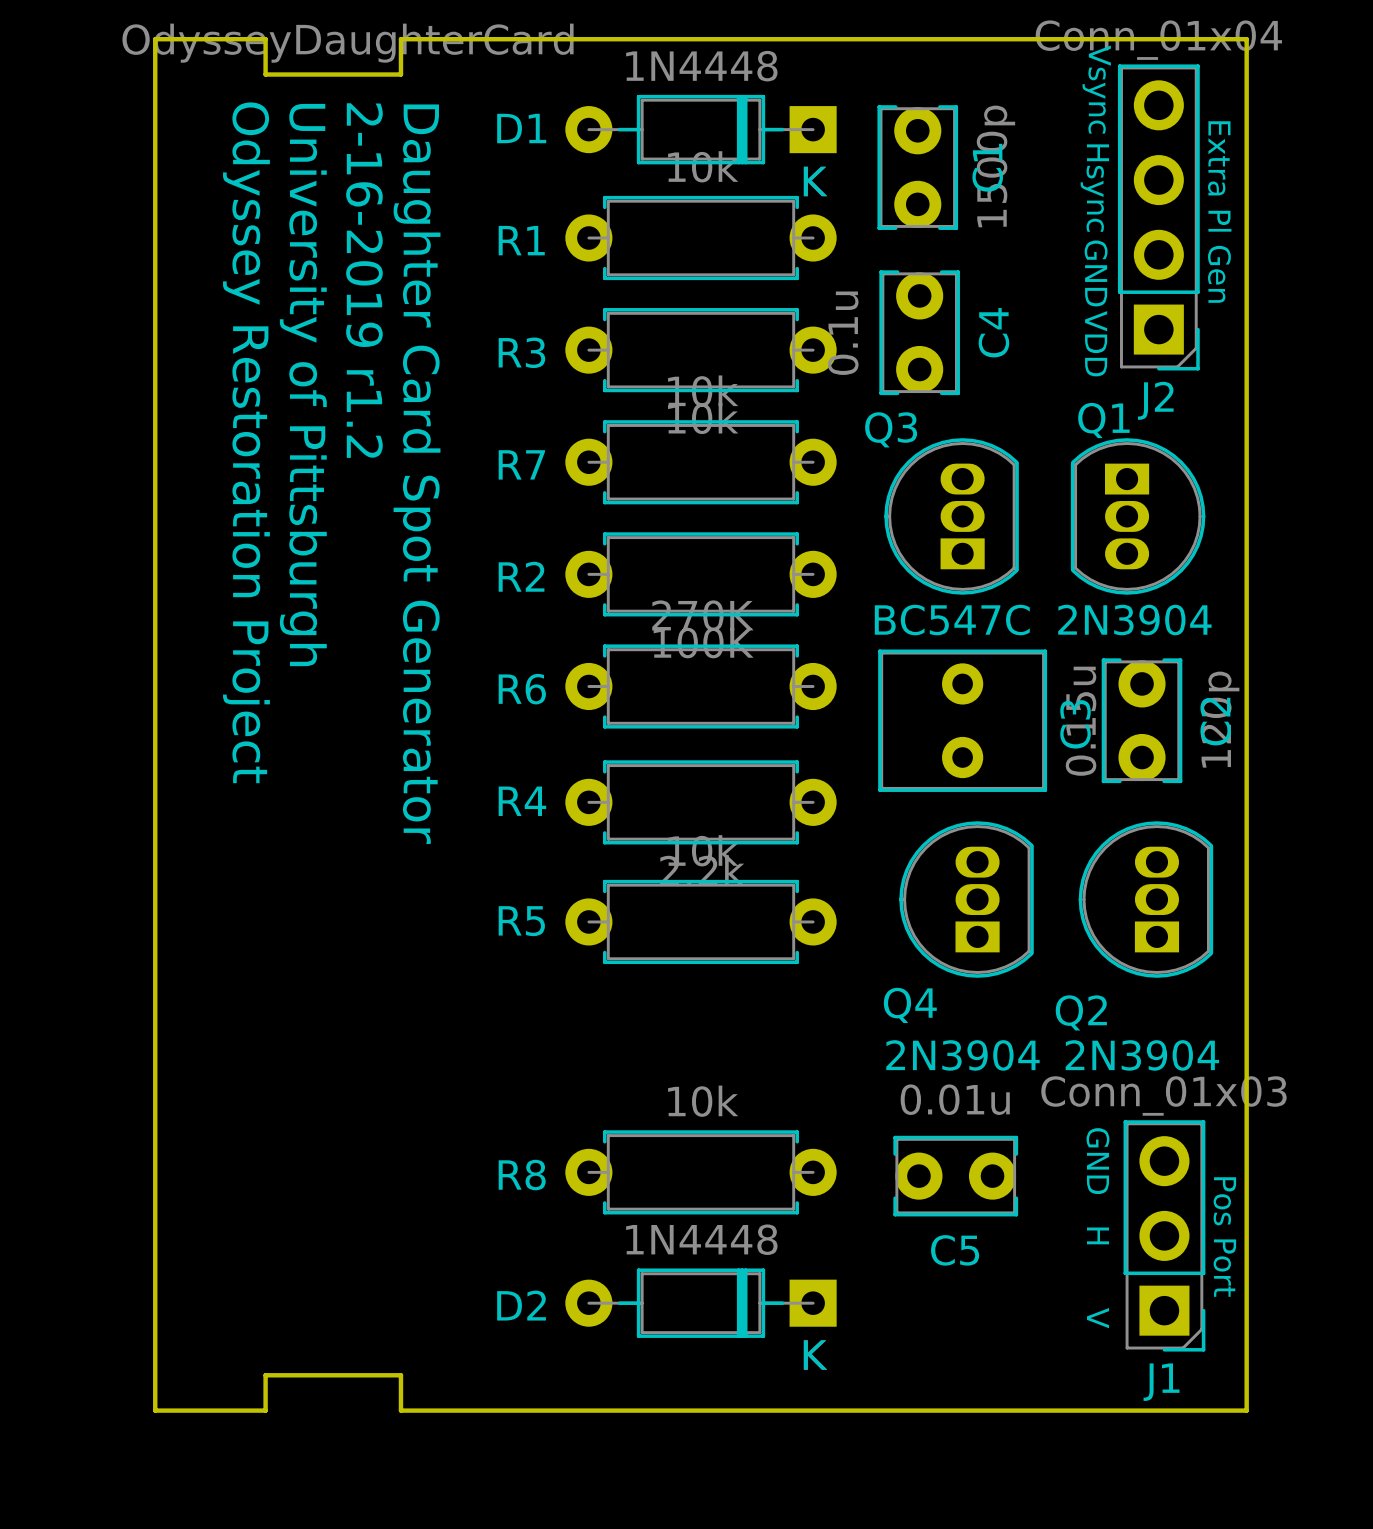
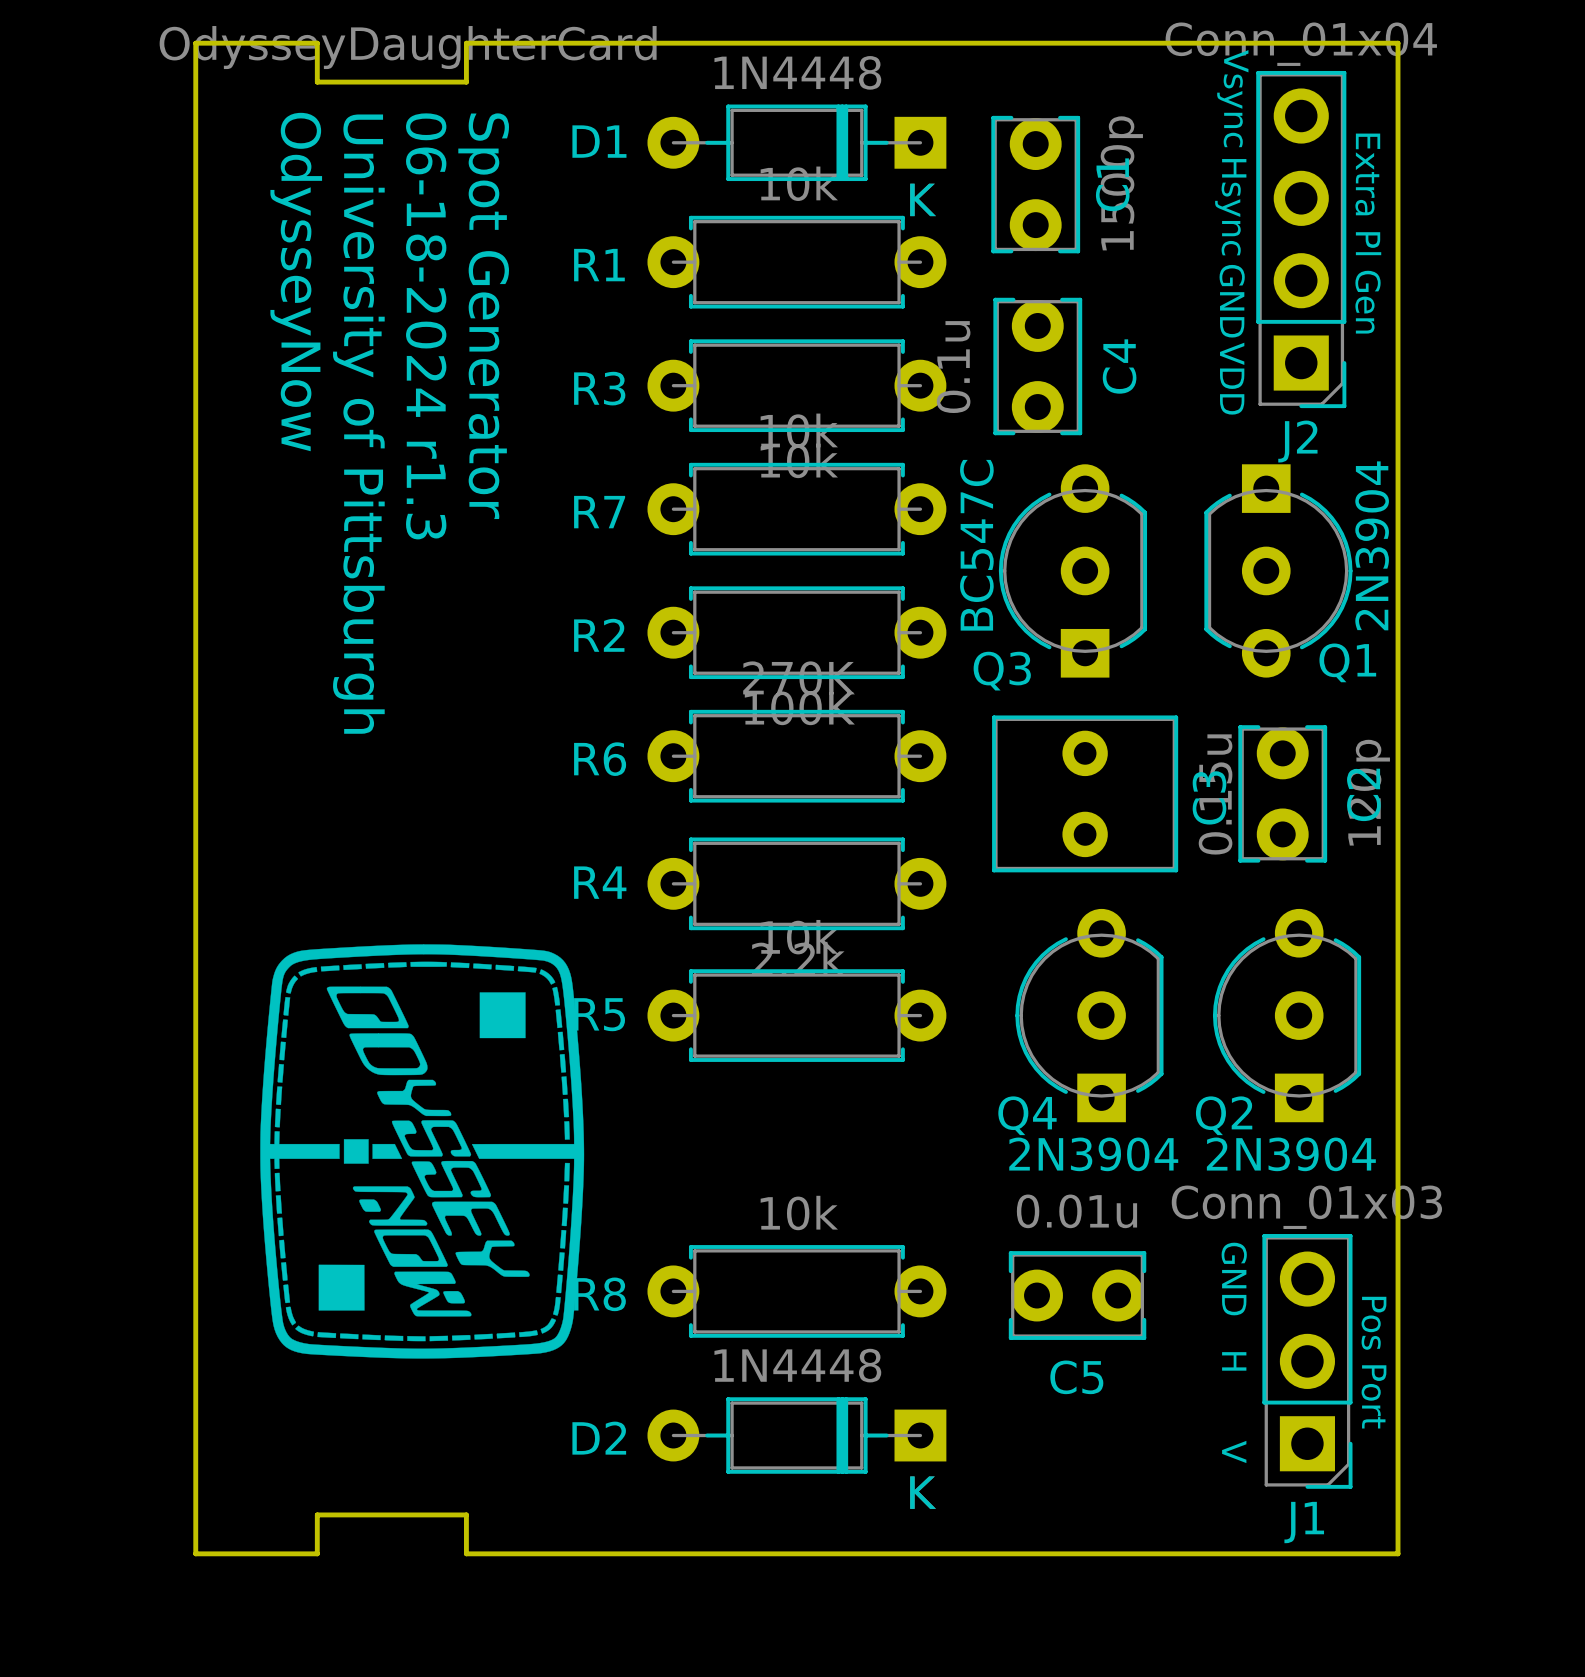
text: 2-16-2019 r1.2 (364, 280) -> 06-18-2024 r1.3 (426, 326)
Q1 name position: Q1 (1103, 420) -> Q1 (1347, 662)
Q3 name position: Q3 (891, 429) -> Q3 (1002, 671)
Q3 footprint: [884, 438, 1019, 595] -> [998, 464, 1148, 678]
Q1 footprint: [1070, 438, 1206, 595] -> [1204, 464, 1353, 678]
text: Odyssey Restoration Project (246, 442) -> OdysseyNow (296, 282)
text: Daughter Card Spot Generator (417, 474) -> Spot Generator (483, 316)
Q3 value position: BC547C (952, 620) -> BC547C (976, 545)
Q1 value position: 2N3904 (1134, 620) -> 2N3904 (1372, 545)
Q4 footprint: [899, 821, 1034, 978] -> [1015, 908, 1164, 1123]
Q2 footprint: [1078, 821, 1214, 978] -> [1212, 908, 1362, 1123]
drawing: none -> [260, 944, 585, 1359]

